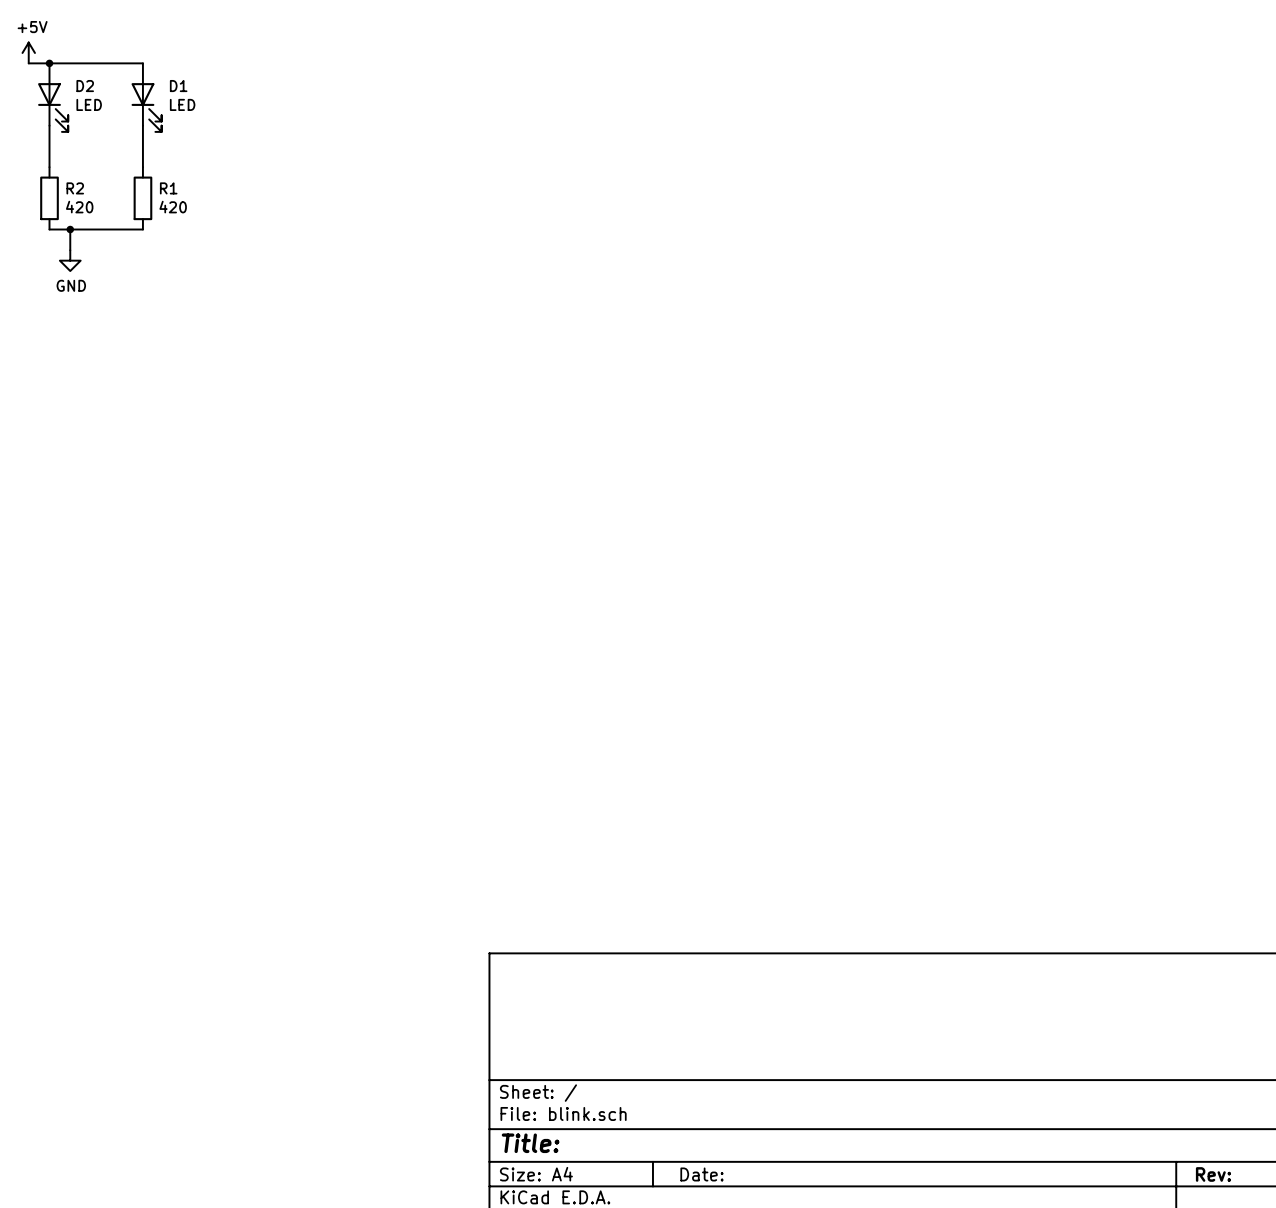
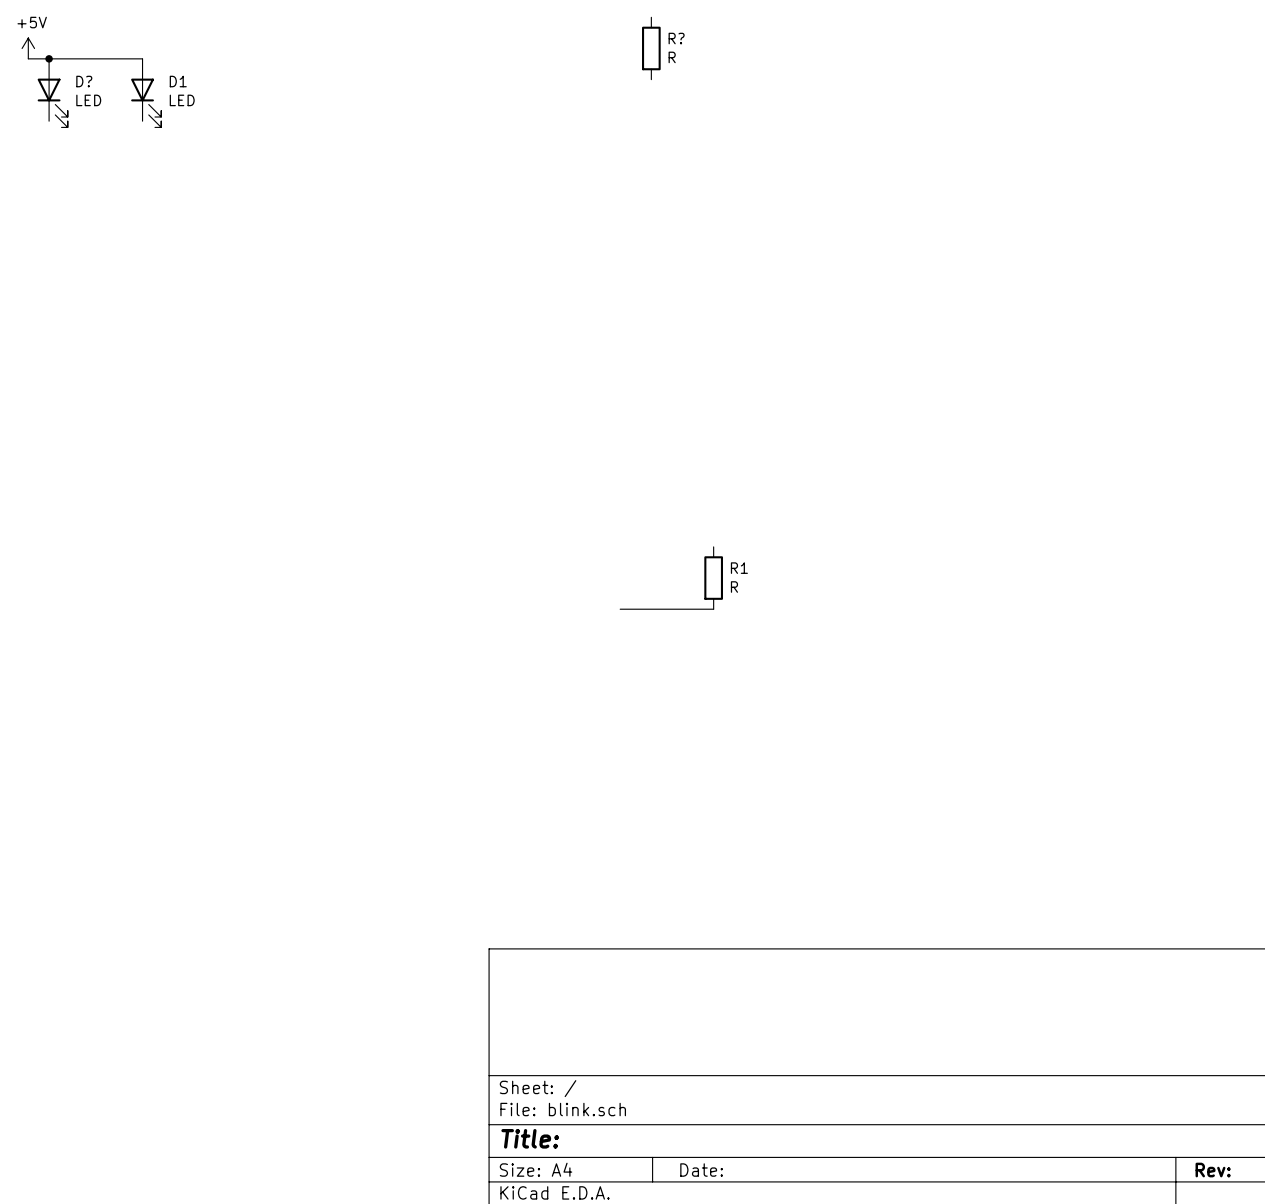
R?: none -> R (651, 48)
D2 name: D2 (85, 86) -> D? (84, 81)
wire: (49, 125) (49, 167) -> none
wire: (142, 125) (142, 167) -> none
R2: 420 (49, 198) -> none
R1 position: (142, 198) -> (713, 578)
R1 value: 420 (173, 207) -> R (734, 587)
wire: (49, 229) (142, 229) -> none
wire: (70, 229) (70, 250) -> none
junction: (70, 229) -> none
power symbol: GND (70, 260) -> none
wire: none -> (620, 609) (713, 609)

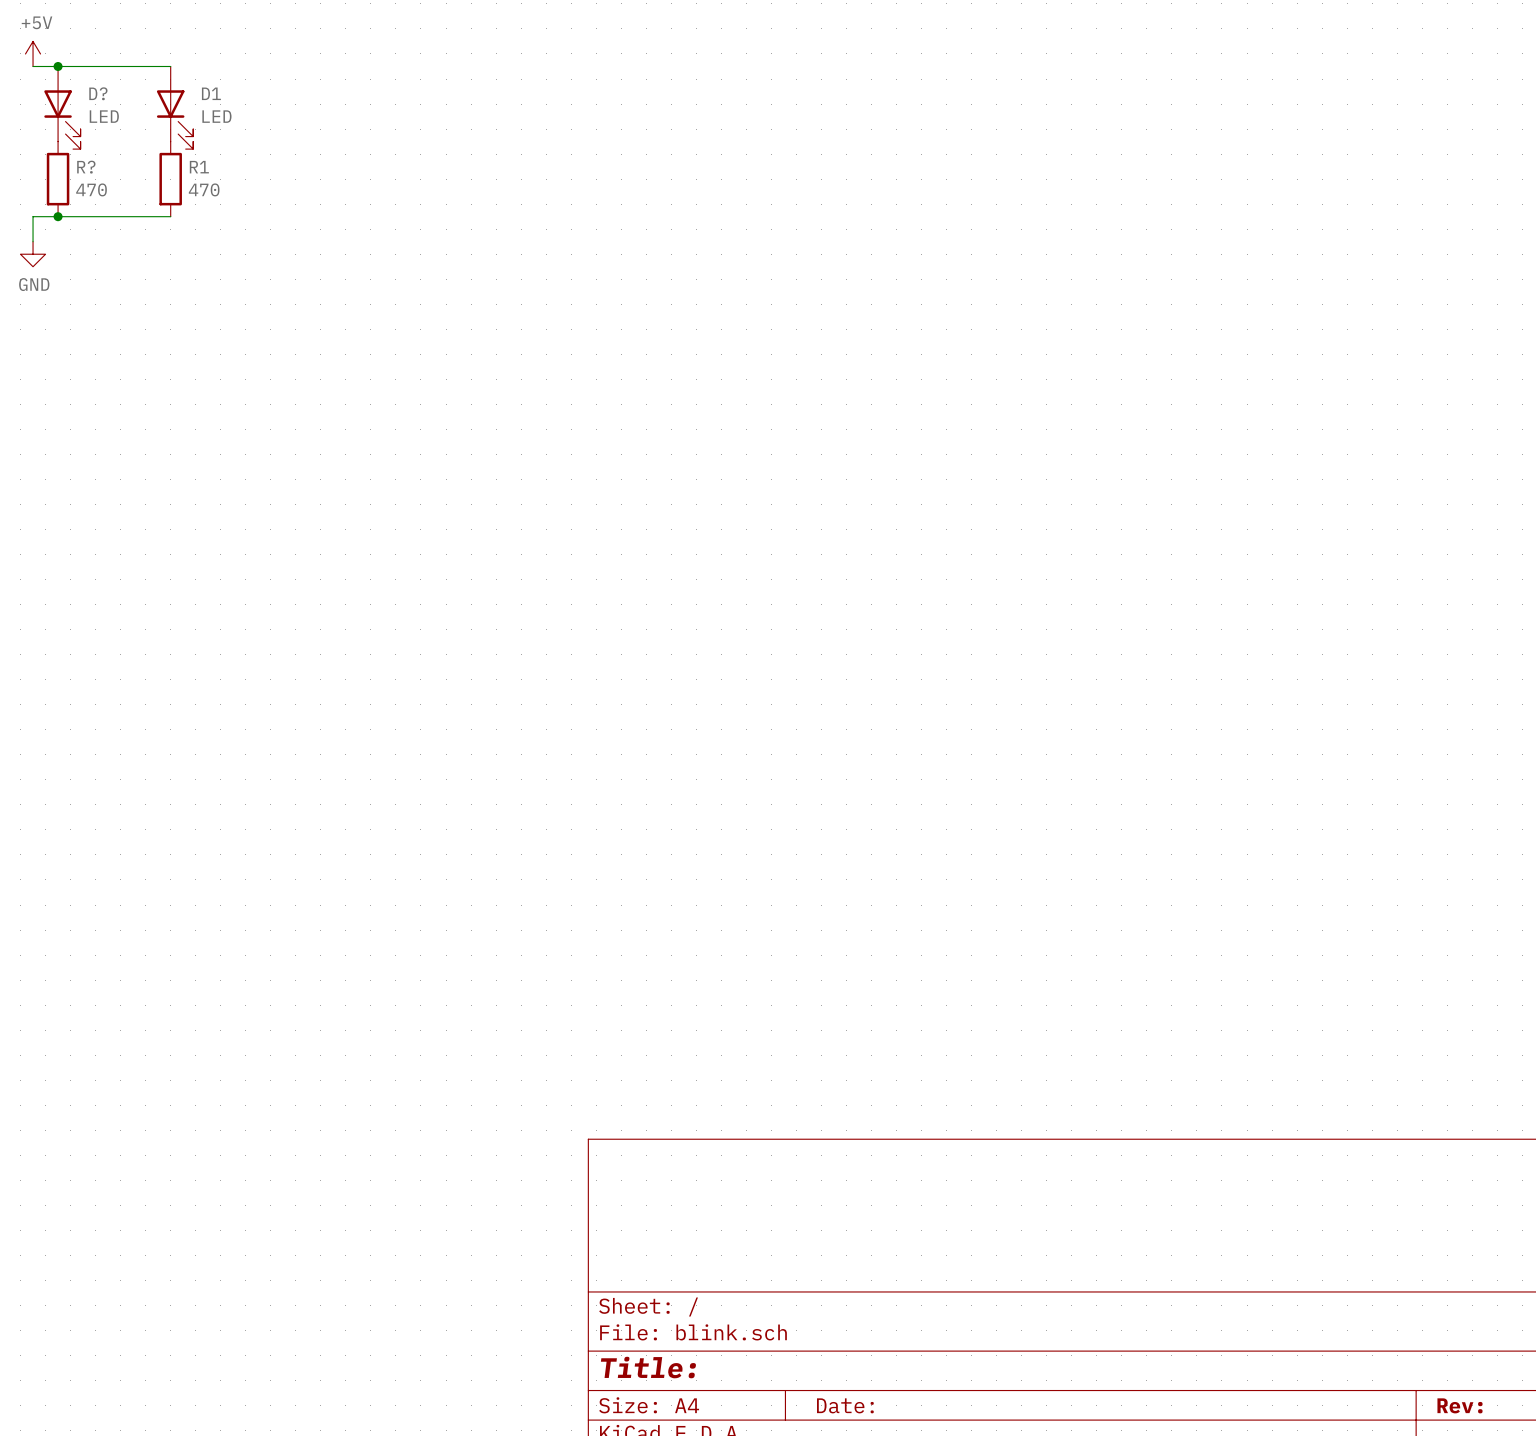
R?: R (651, 48) -> none
R?: none -> 470 (58, 179)
junction: none -> (58, 216)
wire: none -> (170, 216) (33, 216) (33, 241)
power symbol: none -> GND (33, 254)
R1 position: (713, 578) -> (170, 179)
R1 value: R (734, 587) -> 470 (204, 189)
wire: (620, 609) (713, 609) -> none

